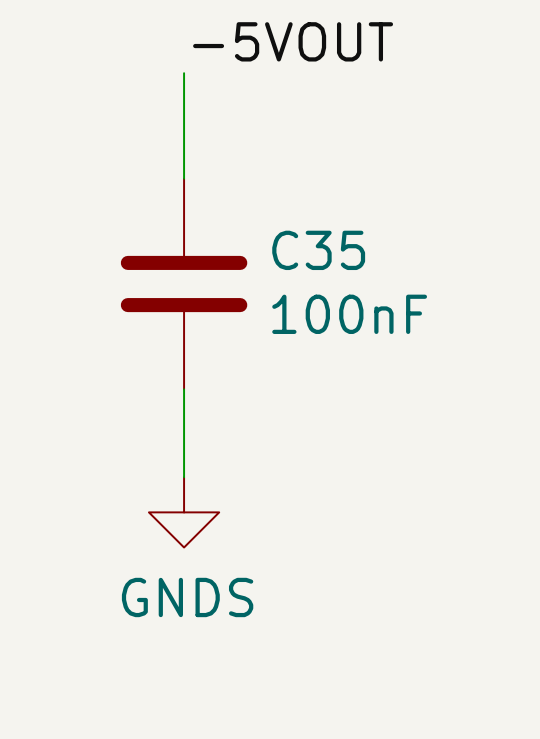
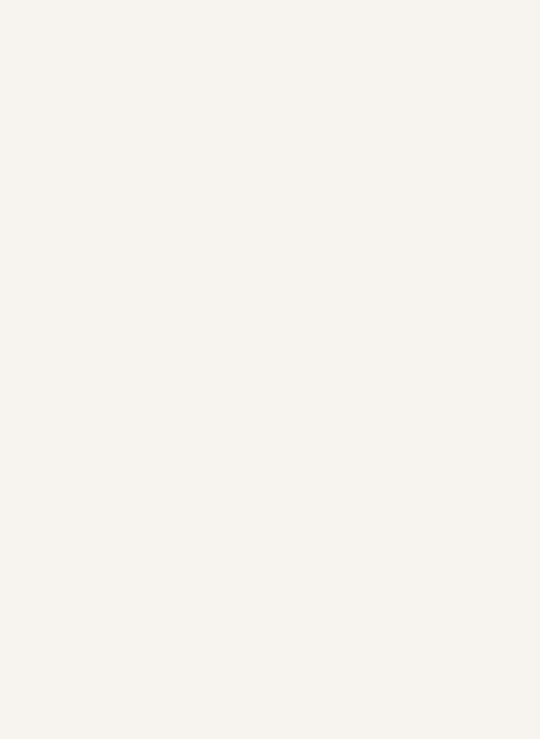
label: -5VOUT (293, 41) -> none
wire: (184, 73) (184, 178) -> none
C35: 100nF (184, 284) -> none
wire: (184, 389) (184, 477) -> none
power symbol: GNDS (184, 512) -> none

